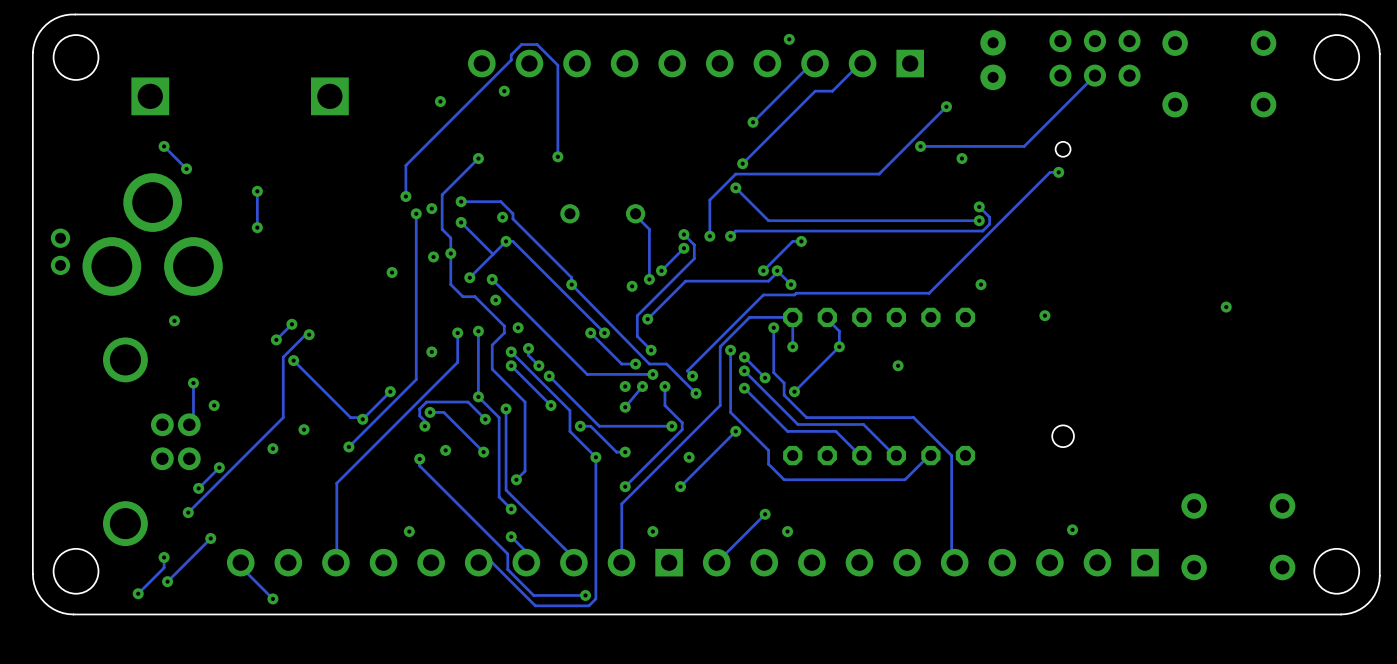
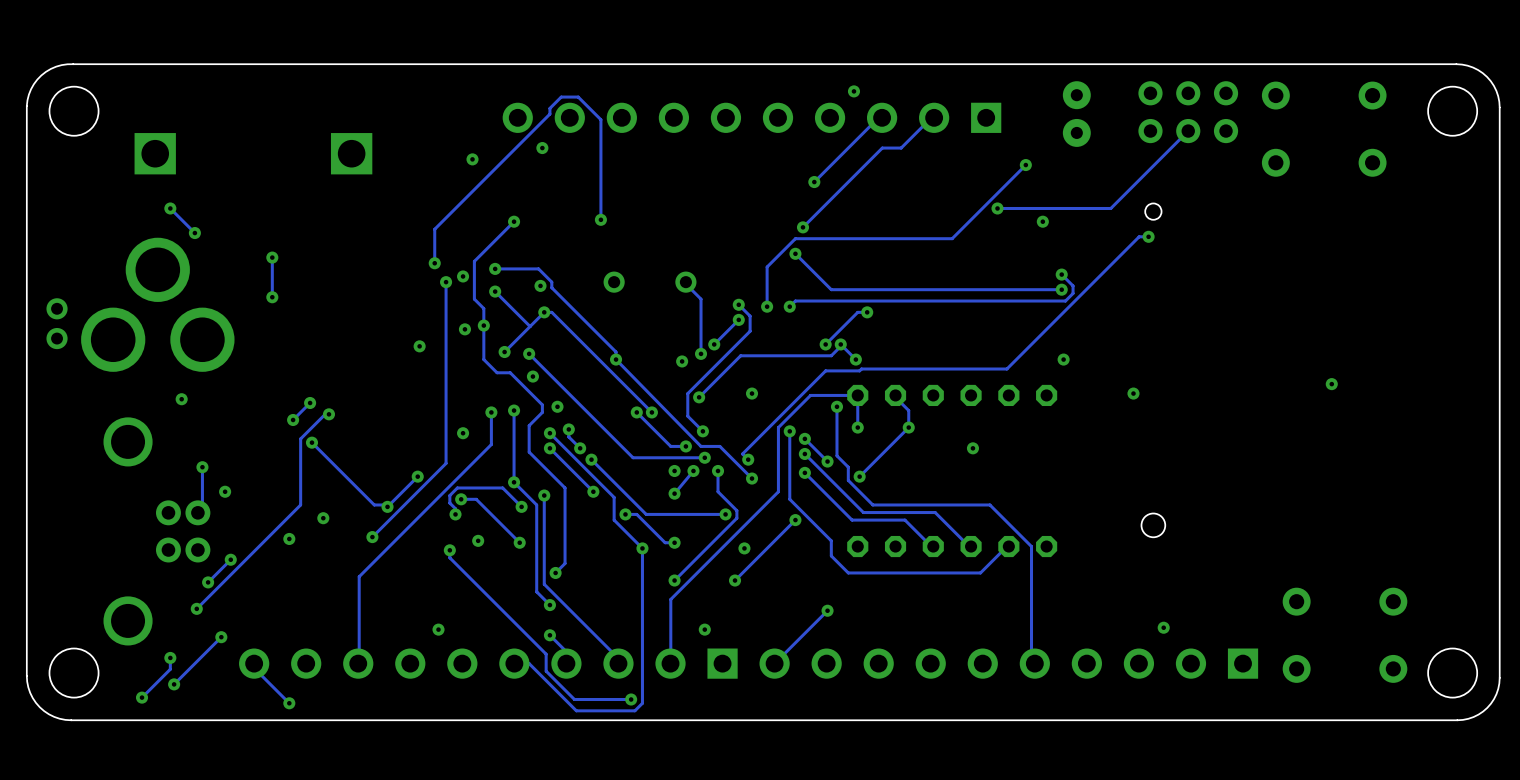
via: none -> (752, 393)
via: (787, 531) -> none

